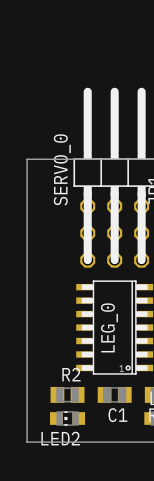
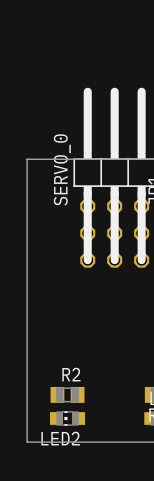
LEG_0: (114, 327) -> none
C1: (114, 394) -> none

